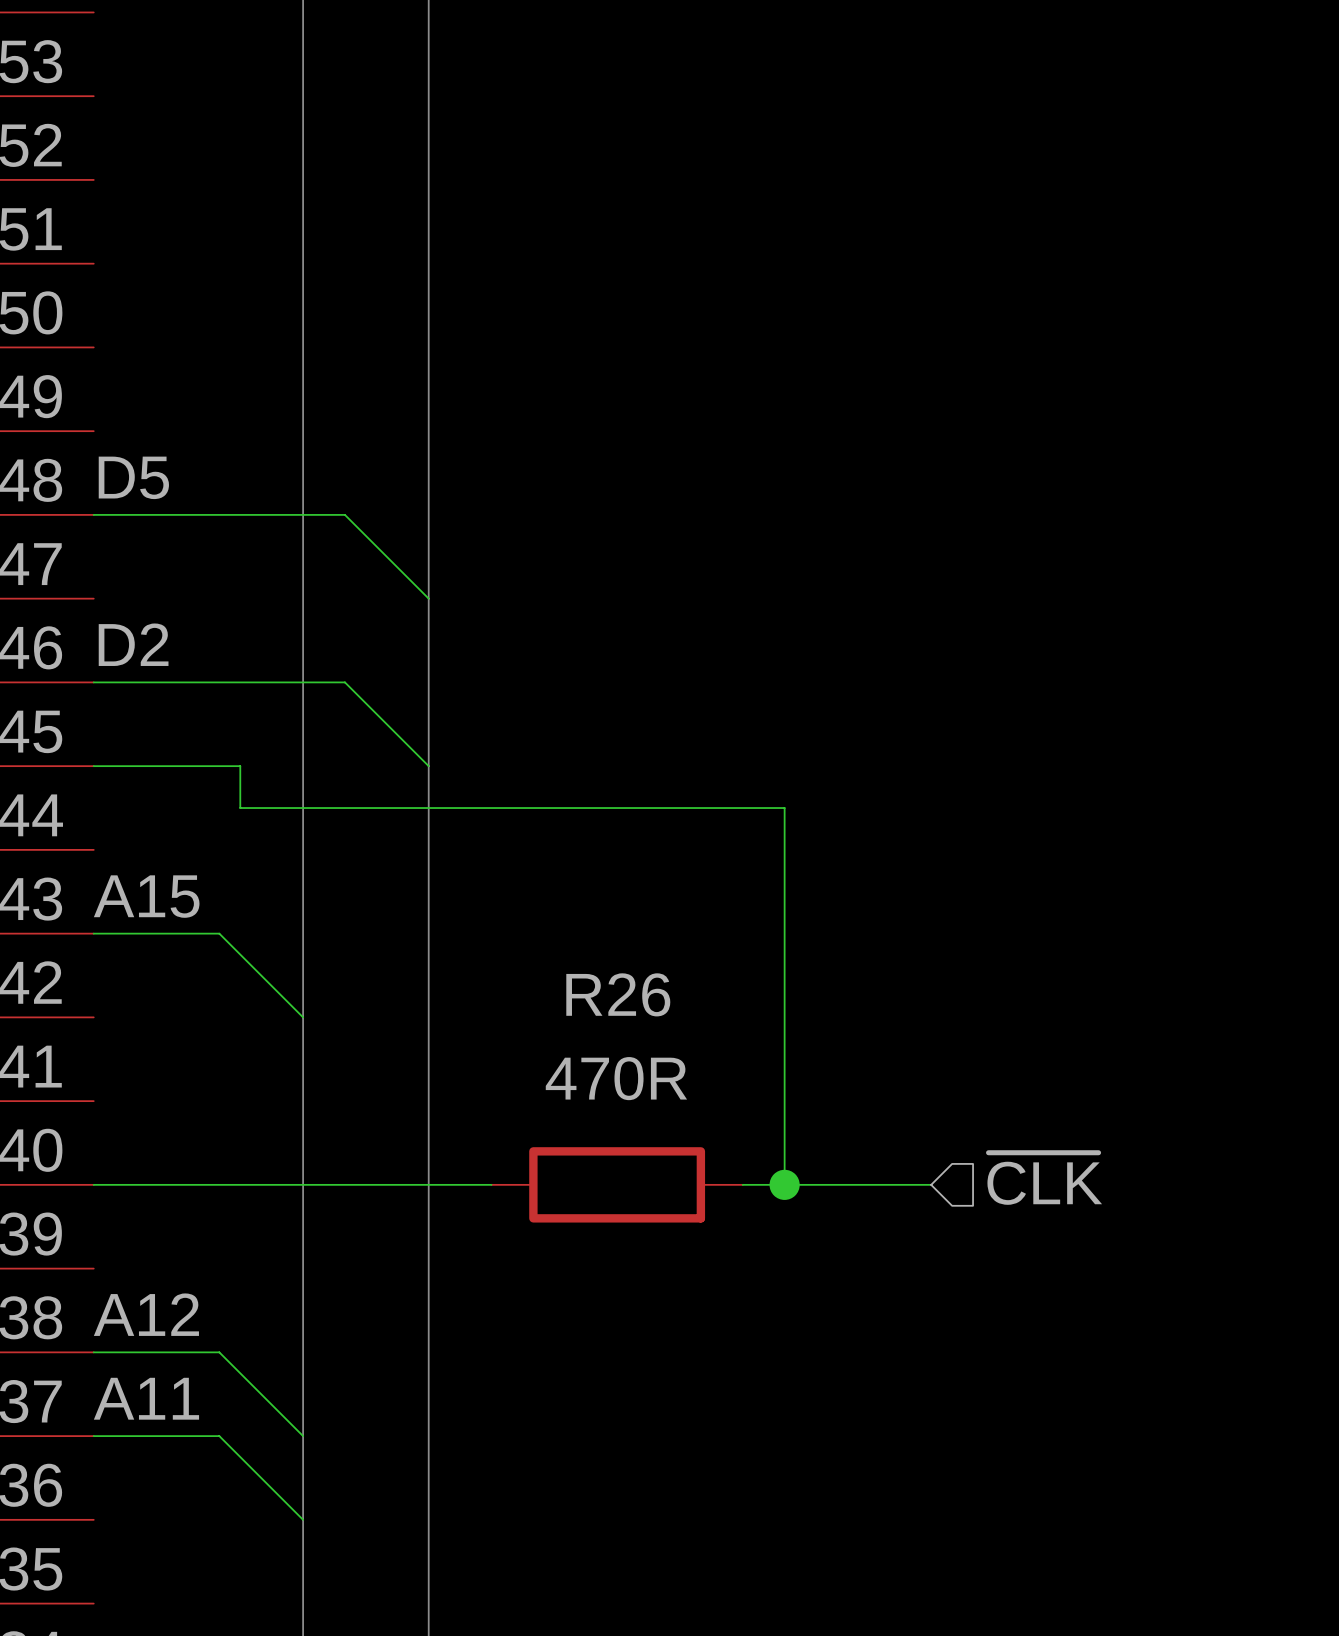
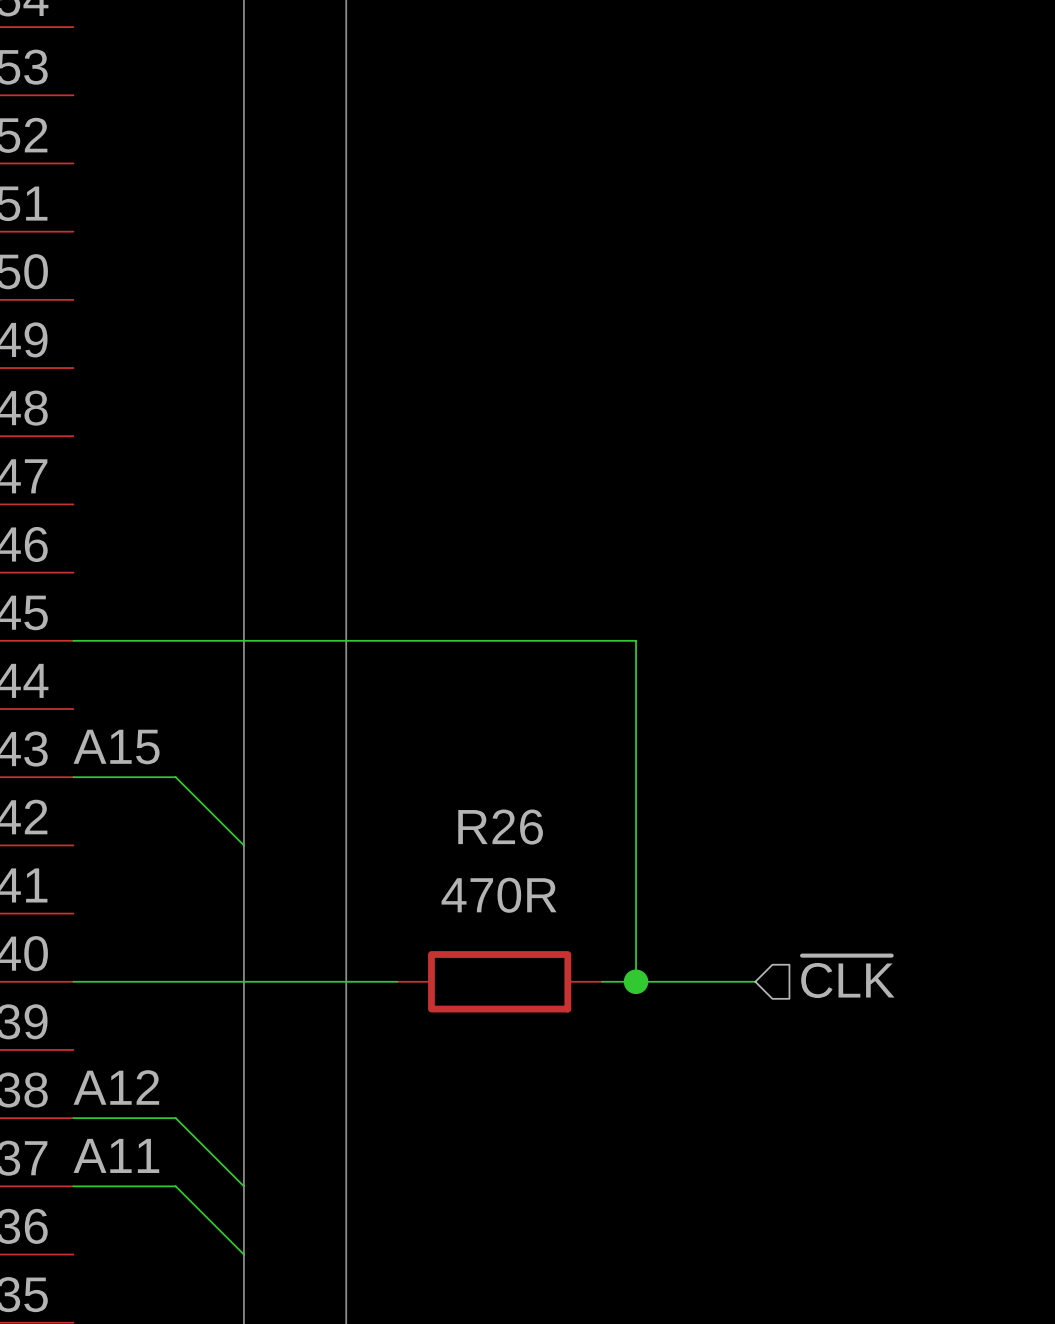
label: D5 (133, 477) -> none
wire: (93, 514) (344, 514) (428, 598) -> none
label: D2 (133, 644) -> none
wire: (93, 682) (344, 682) (428, 766) -> none
wire: (240, 766) (240, 808) (784, 808) -> (192, 640) (636, 640) (636, 674)

